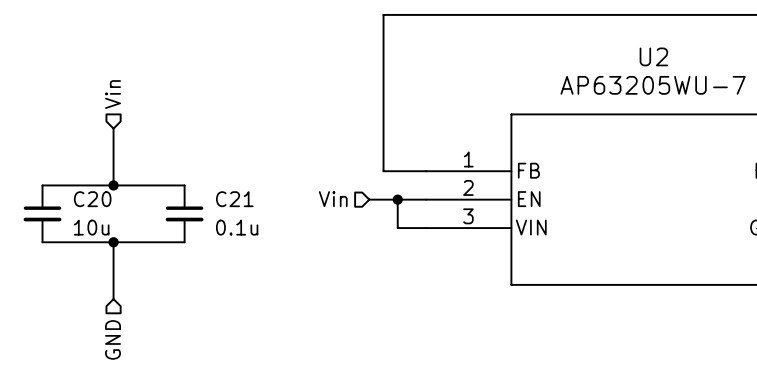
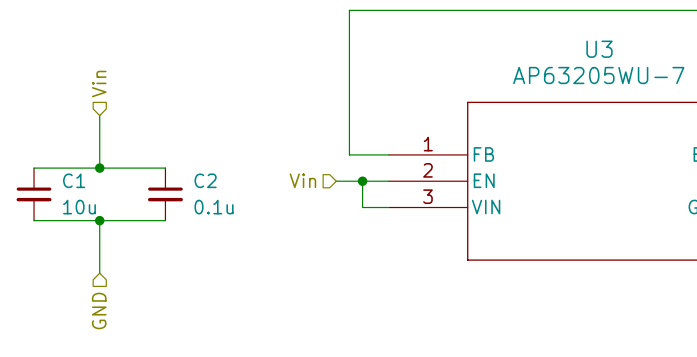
U2 name: U2 (653, 56) -> U3 (599, 49)
C20 name: C20 (92, 199) -> C1 (74, 180)
C21 name: C21 (234, 199) -> C2 (205, 180)

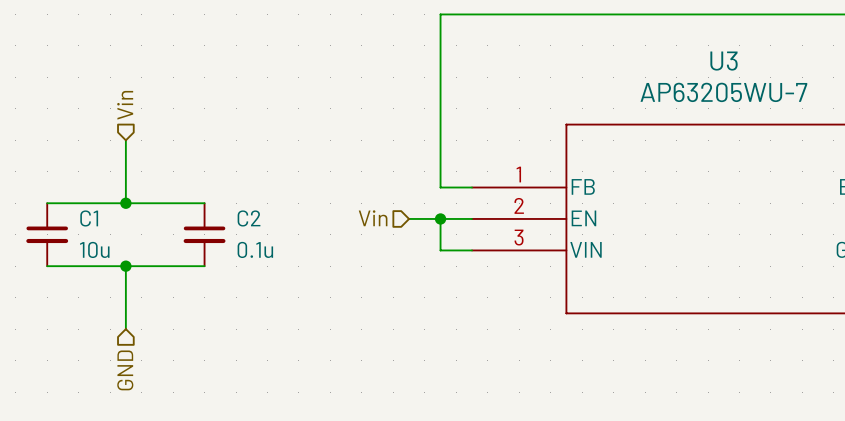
wire: (362, 10) (349, 10) (349, 154) (362, 154) -> (440, 14) (440, 187)

